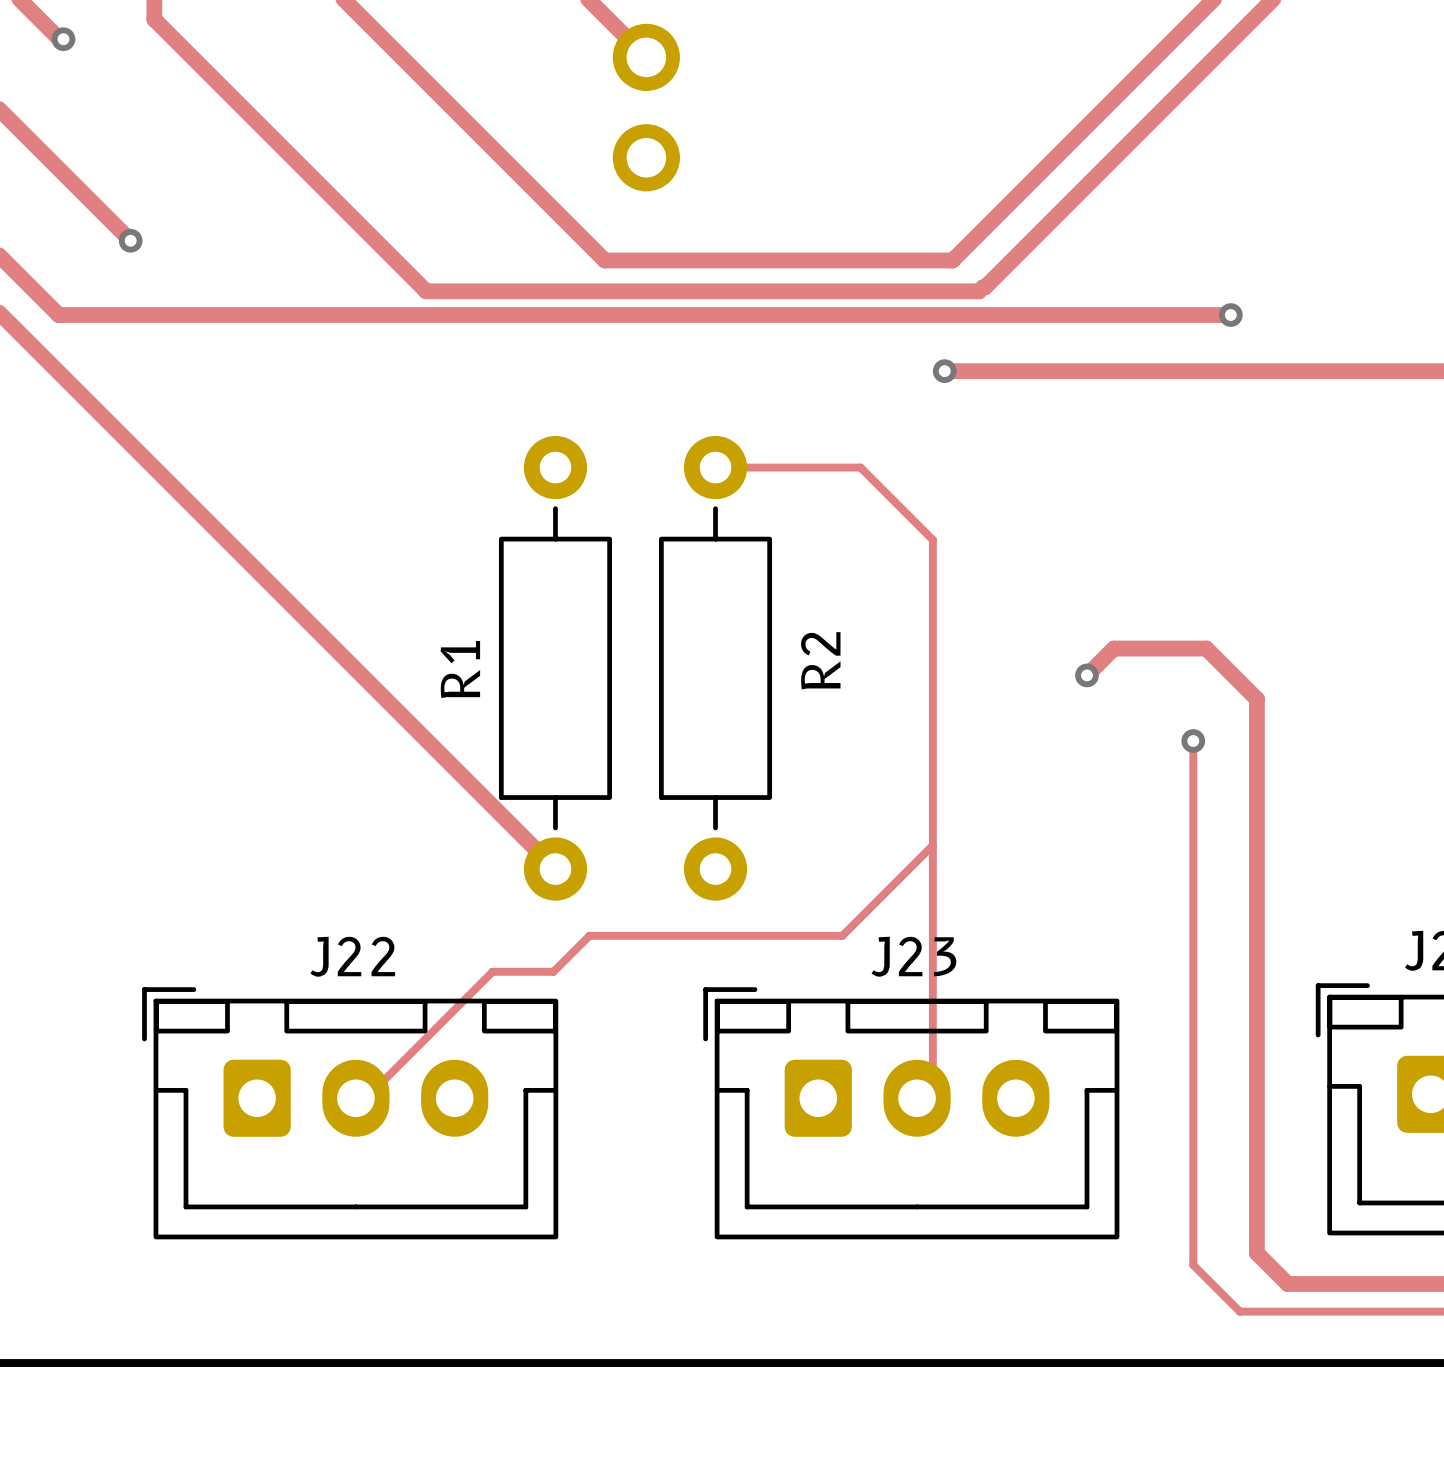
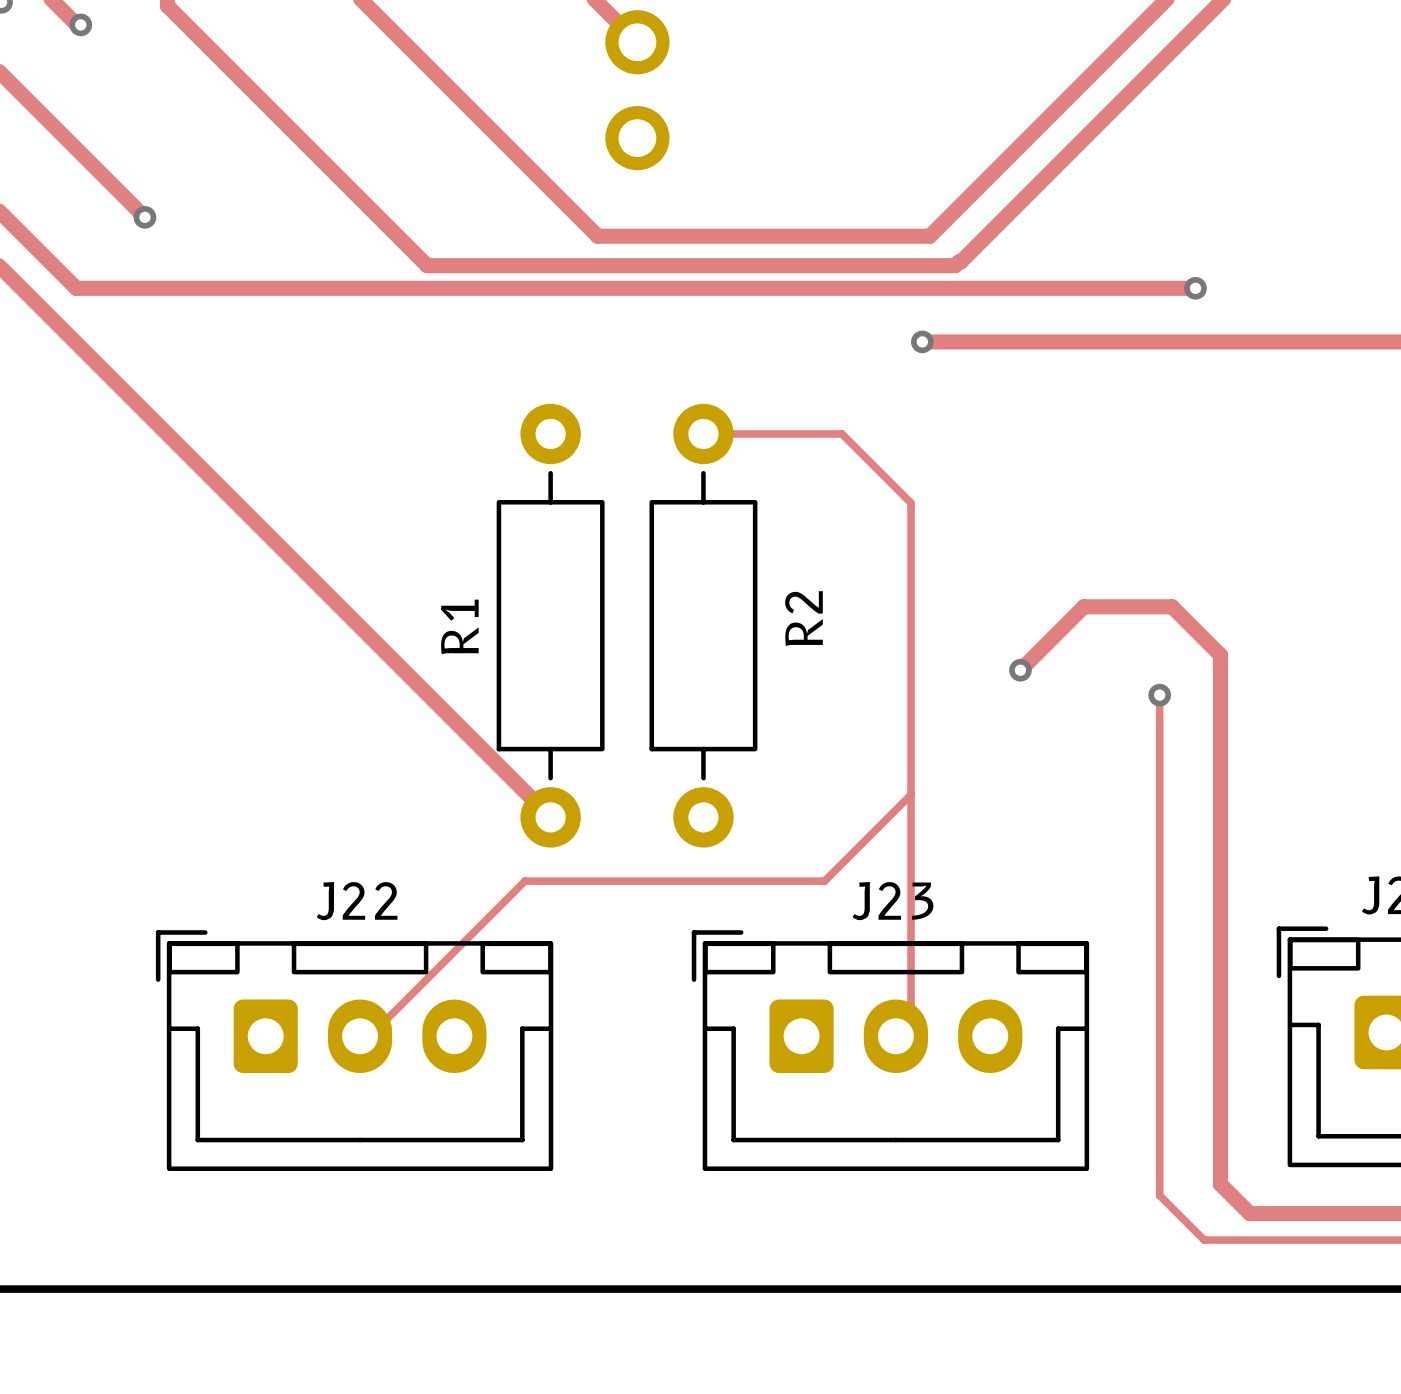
track: none -> (1058, 632) (1020, 670)
via position: (1086, 675) -> (1020, 670)
track: (589, 935) (553, 971) (492, 971) -> (583, 881) (524, 881) (490, 915)

